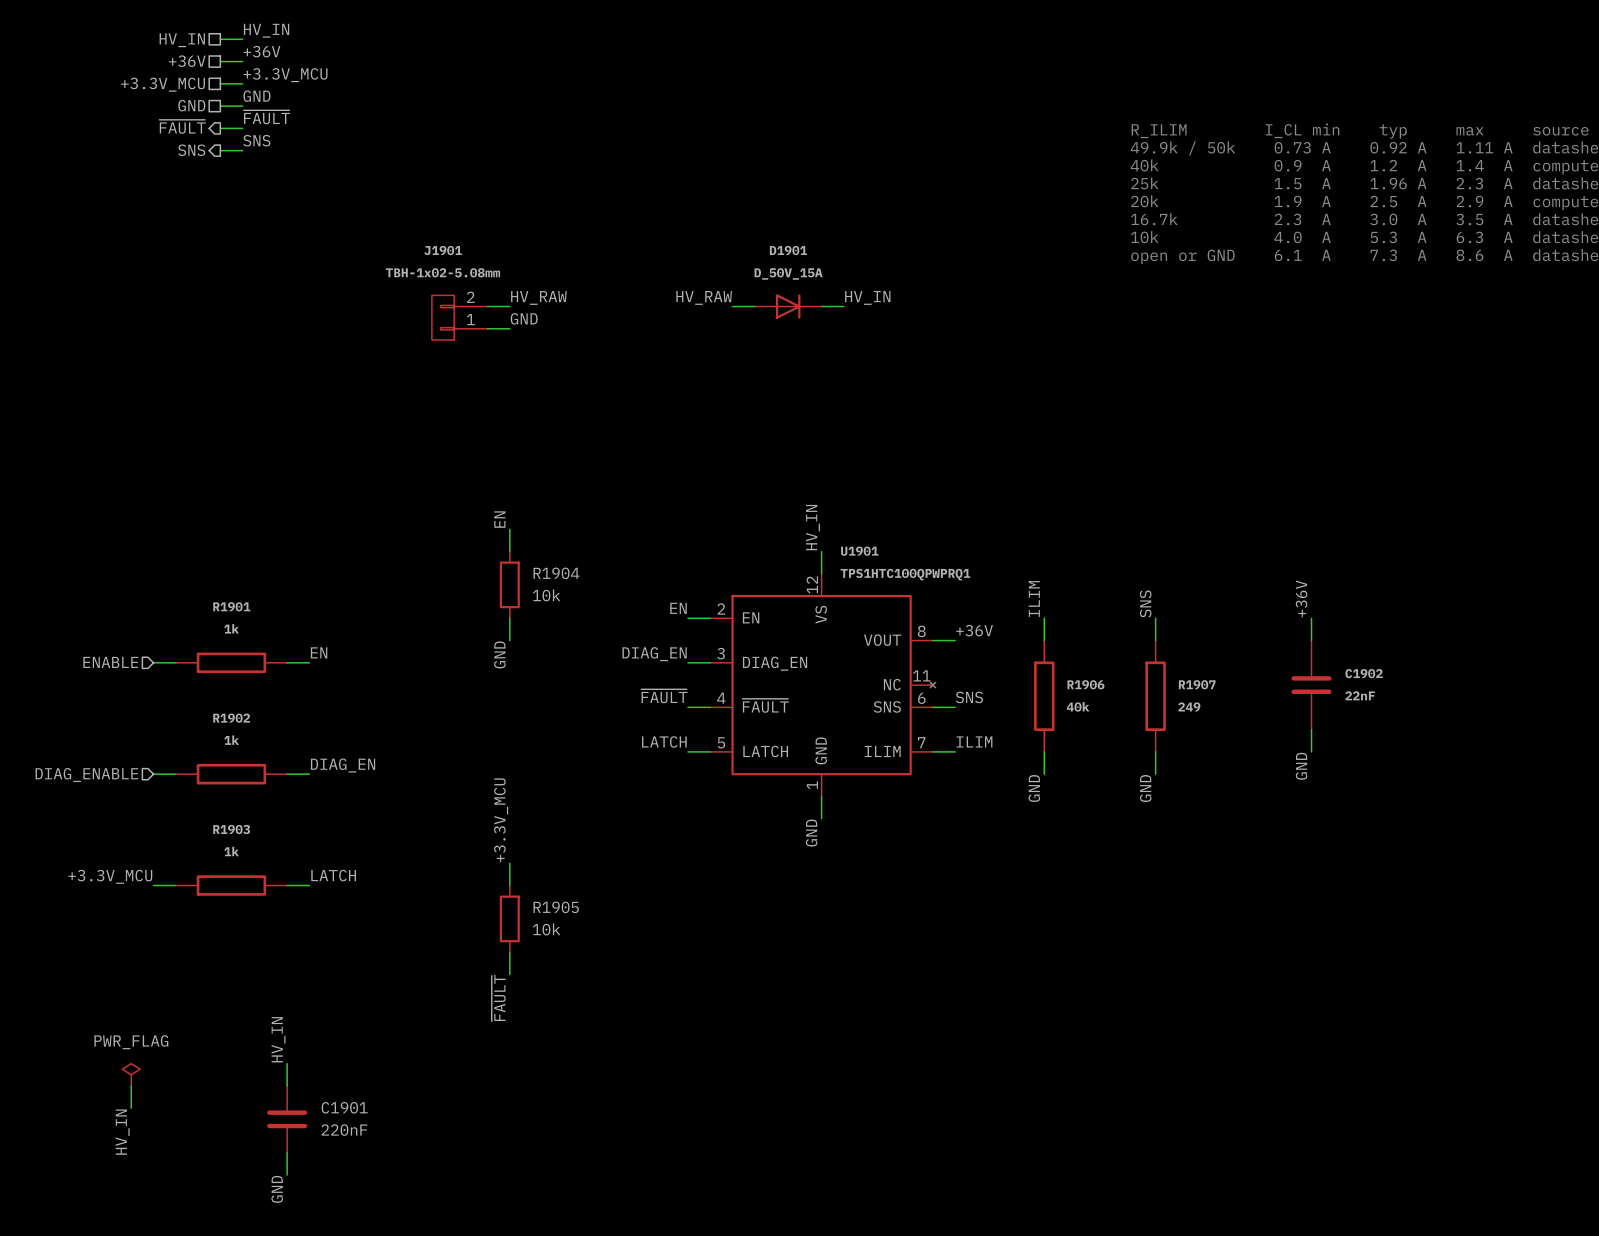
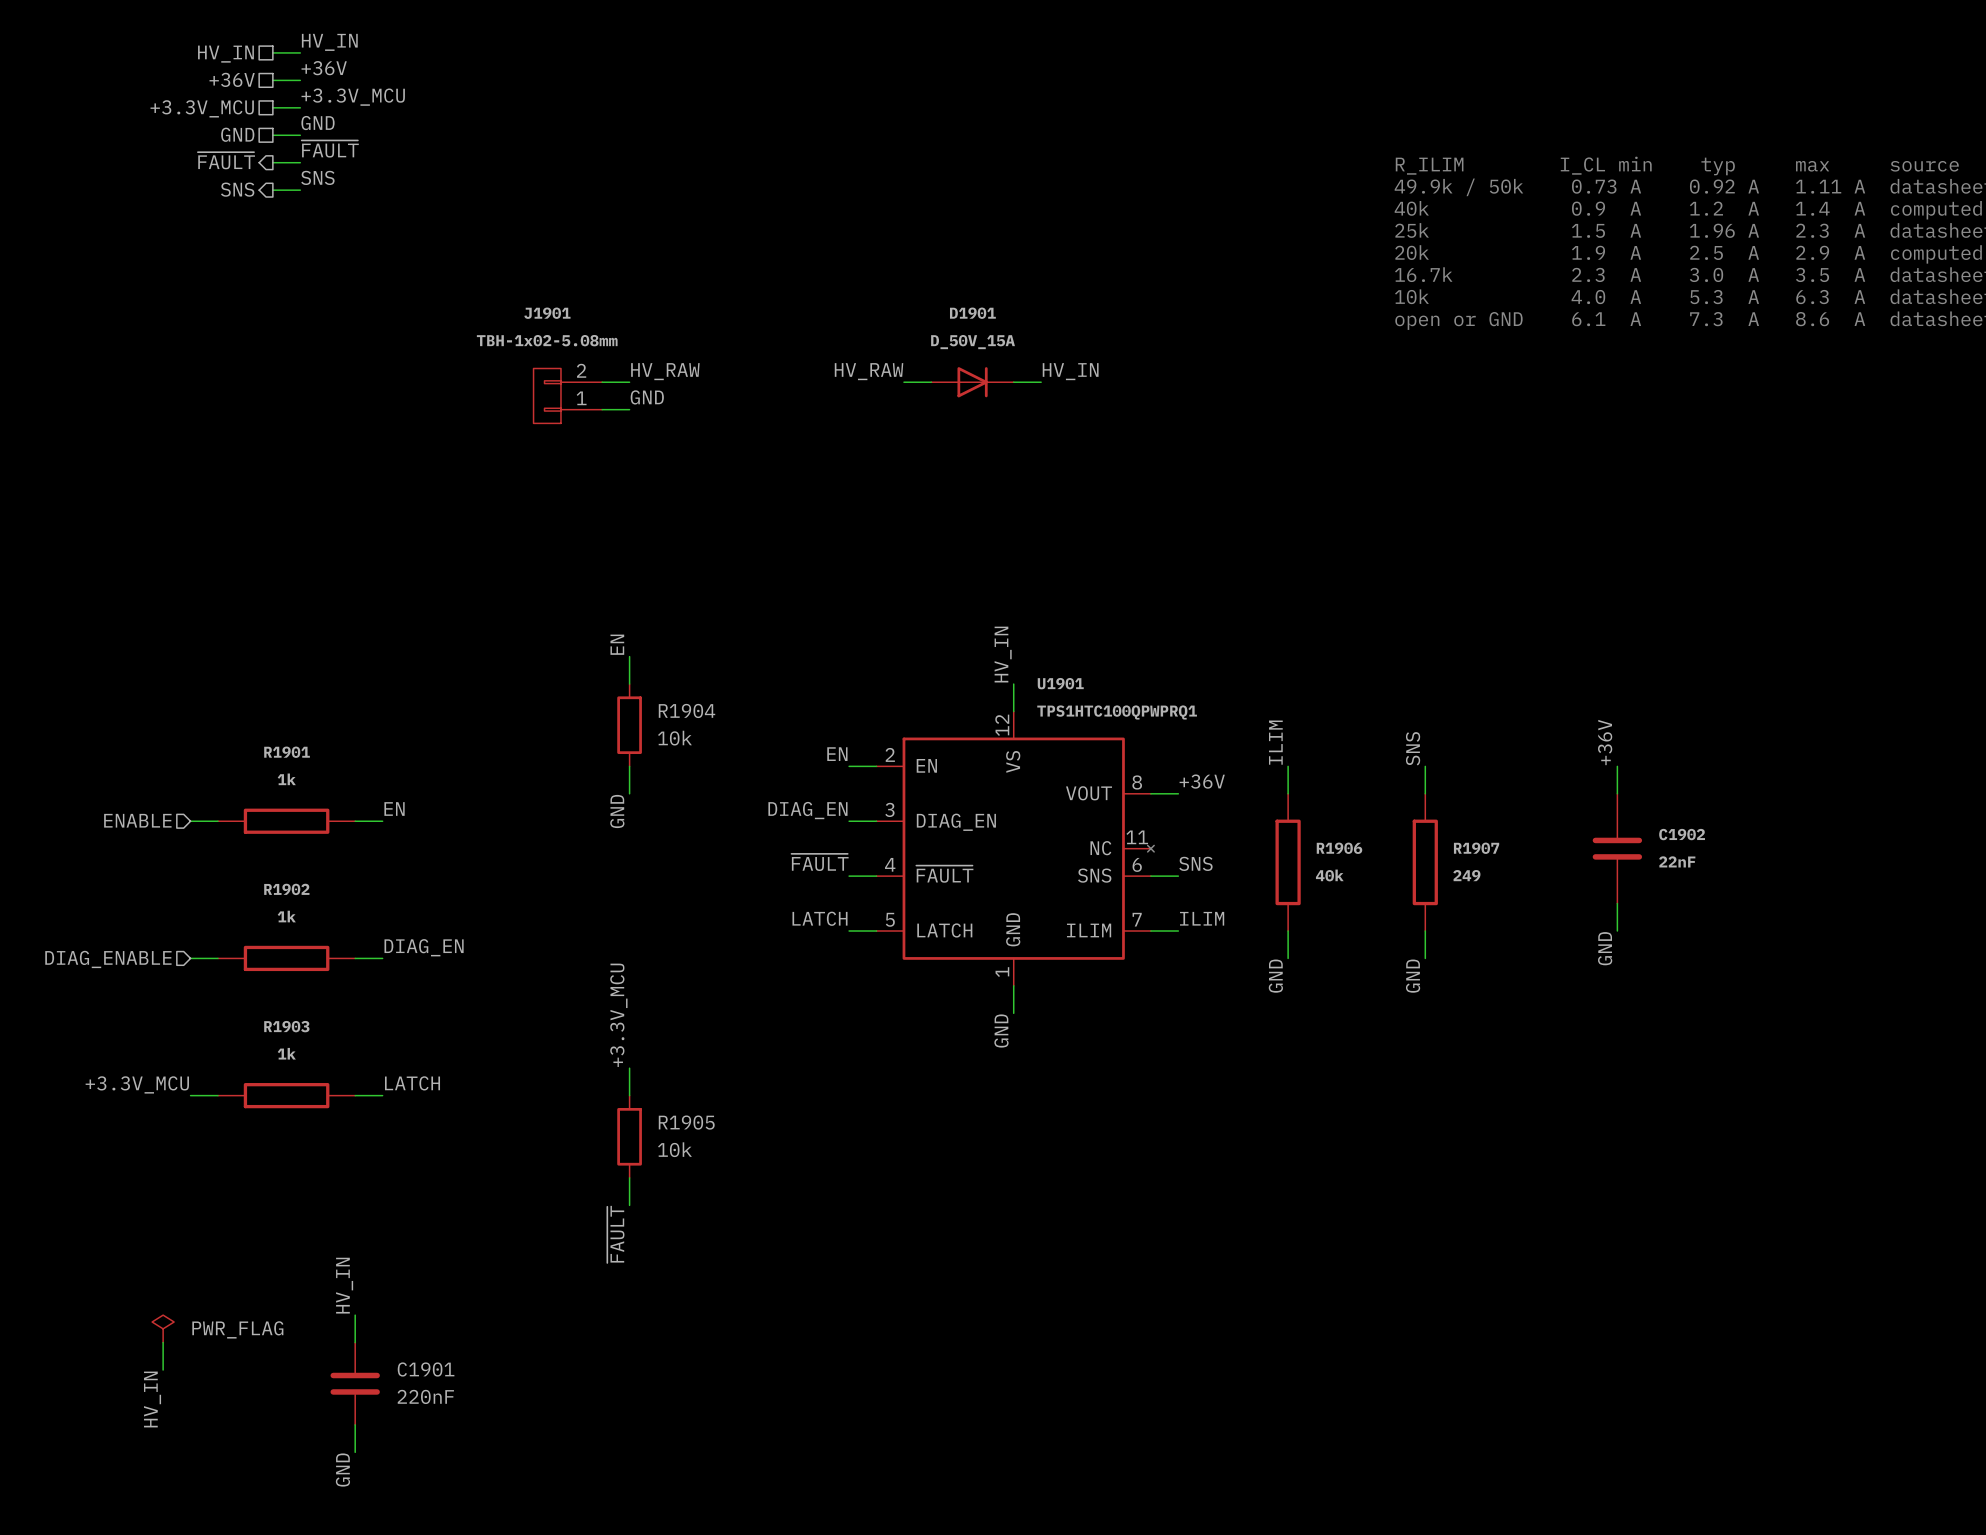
power symbol text position: PWR_FLAG (131, 1042) -> PWR_FLAG (237, 1329)

